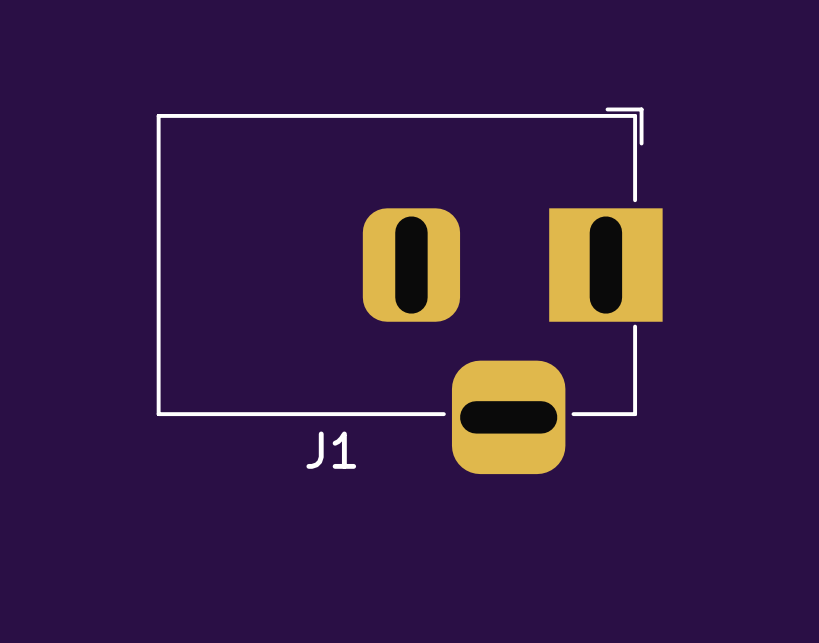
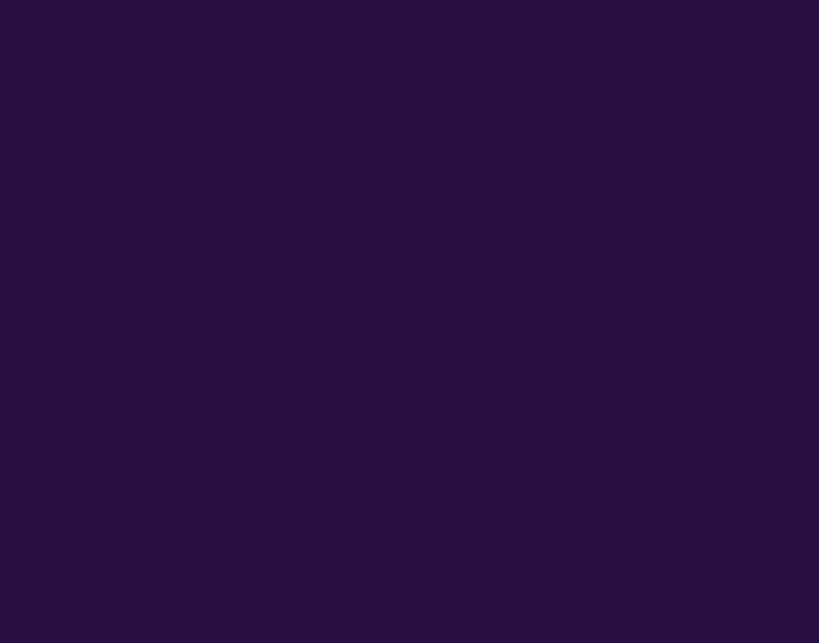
J1: (409, 290) -> none

